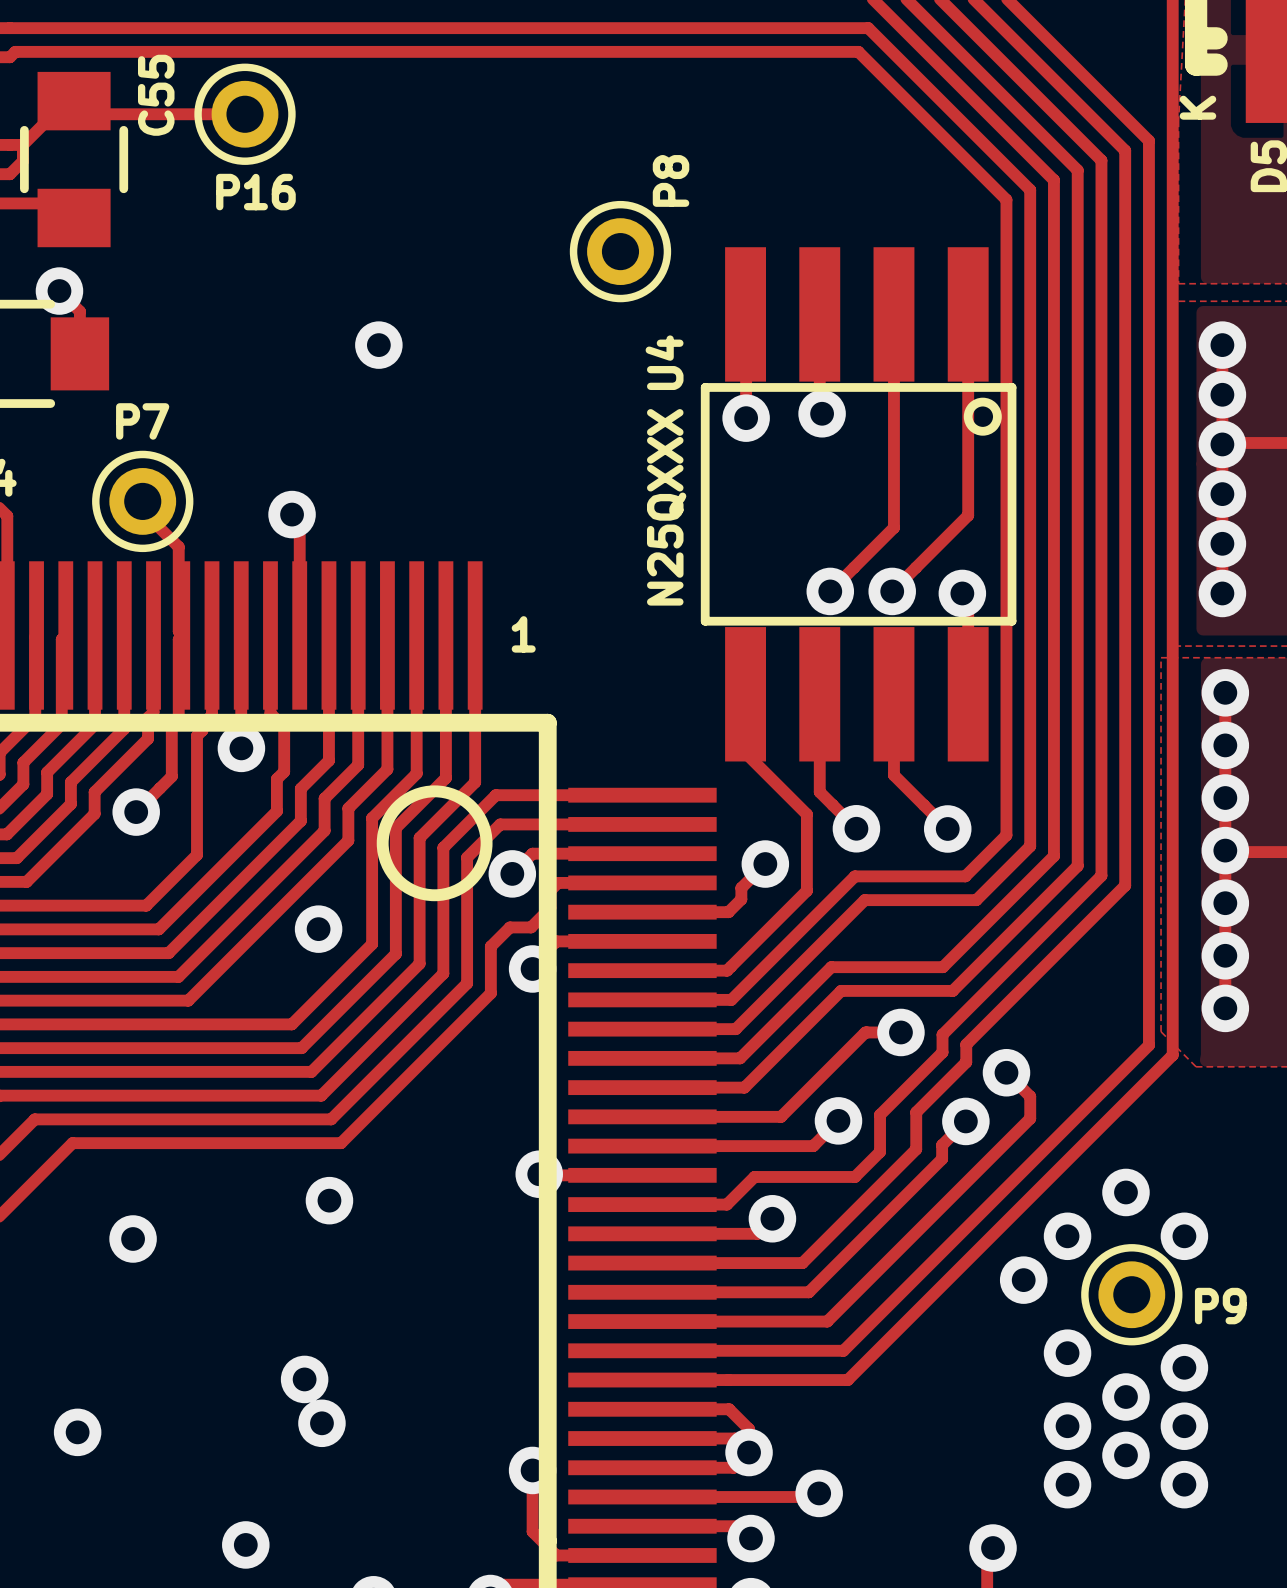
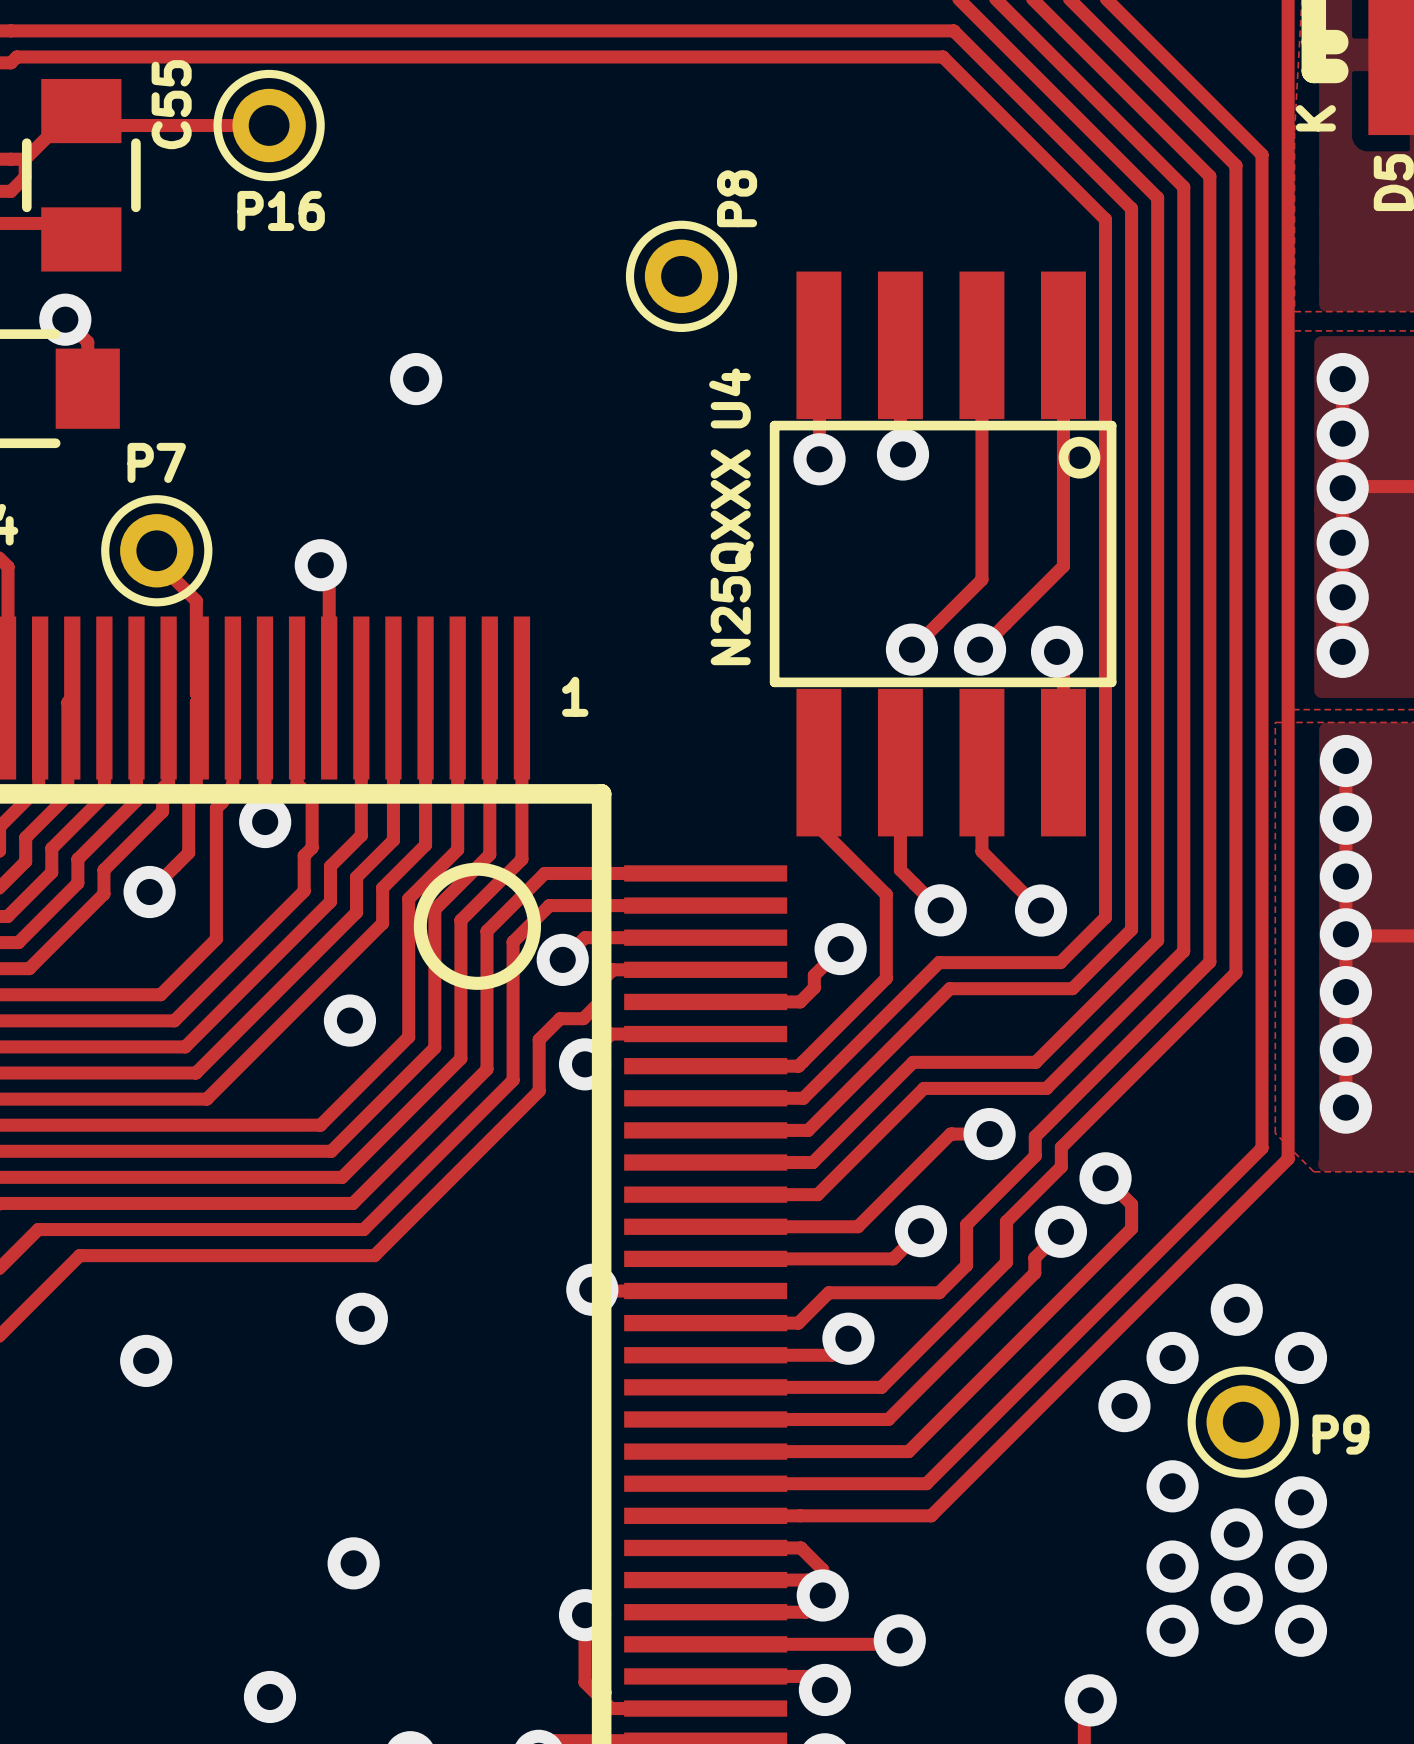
via: (304, 1379) -> none
via: (77, 1432) -> none

